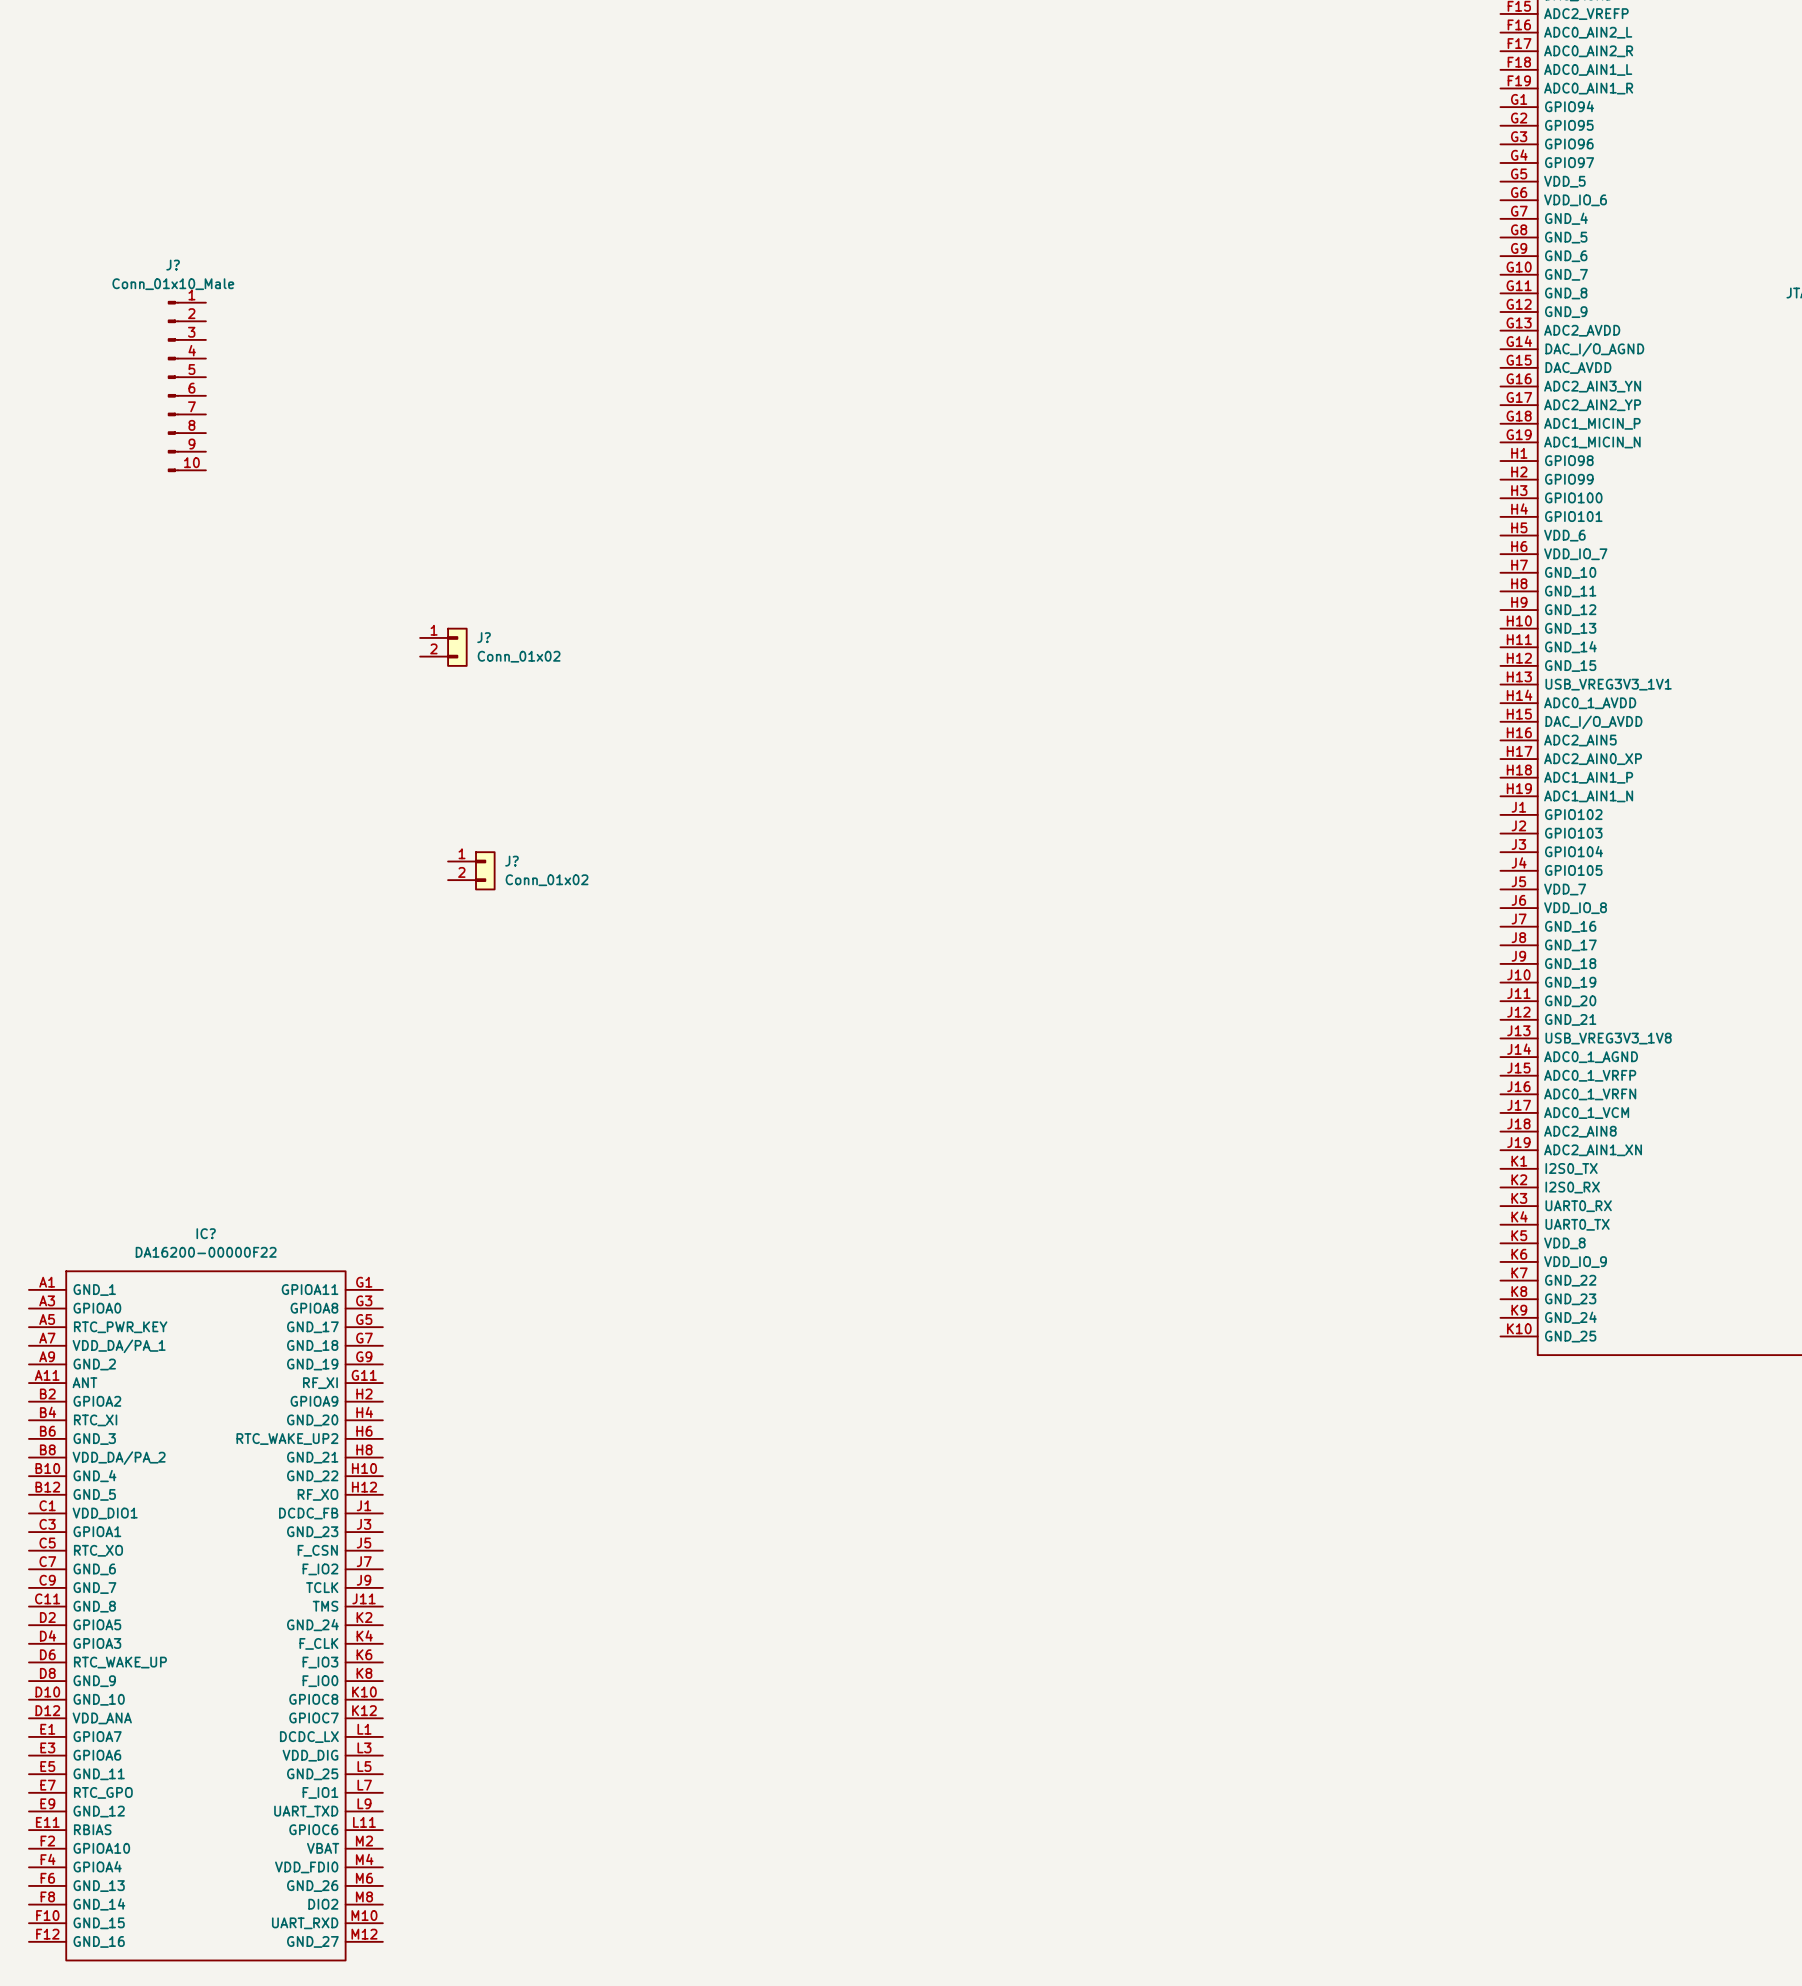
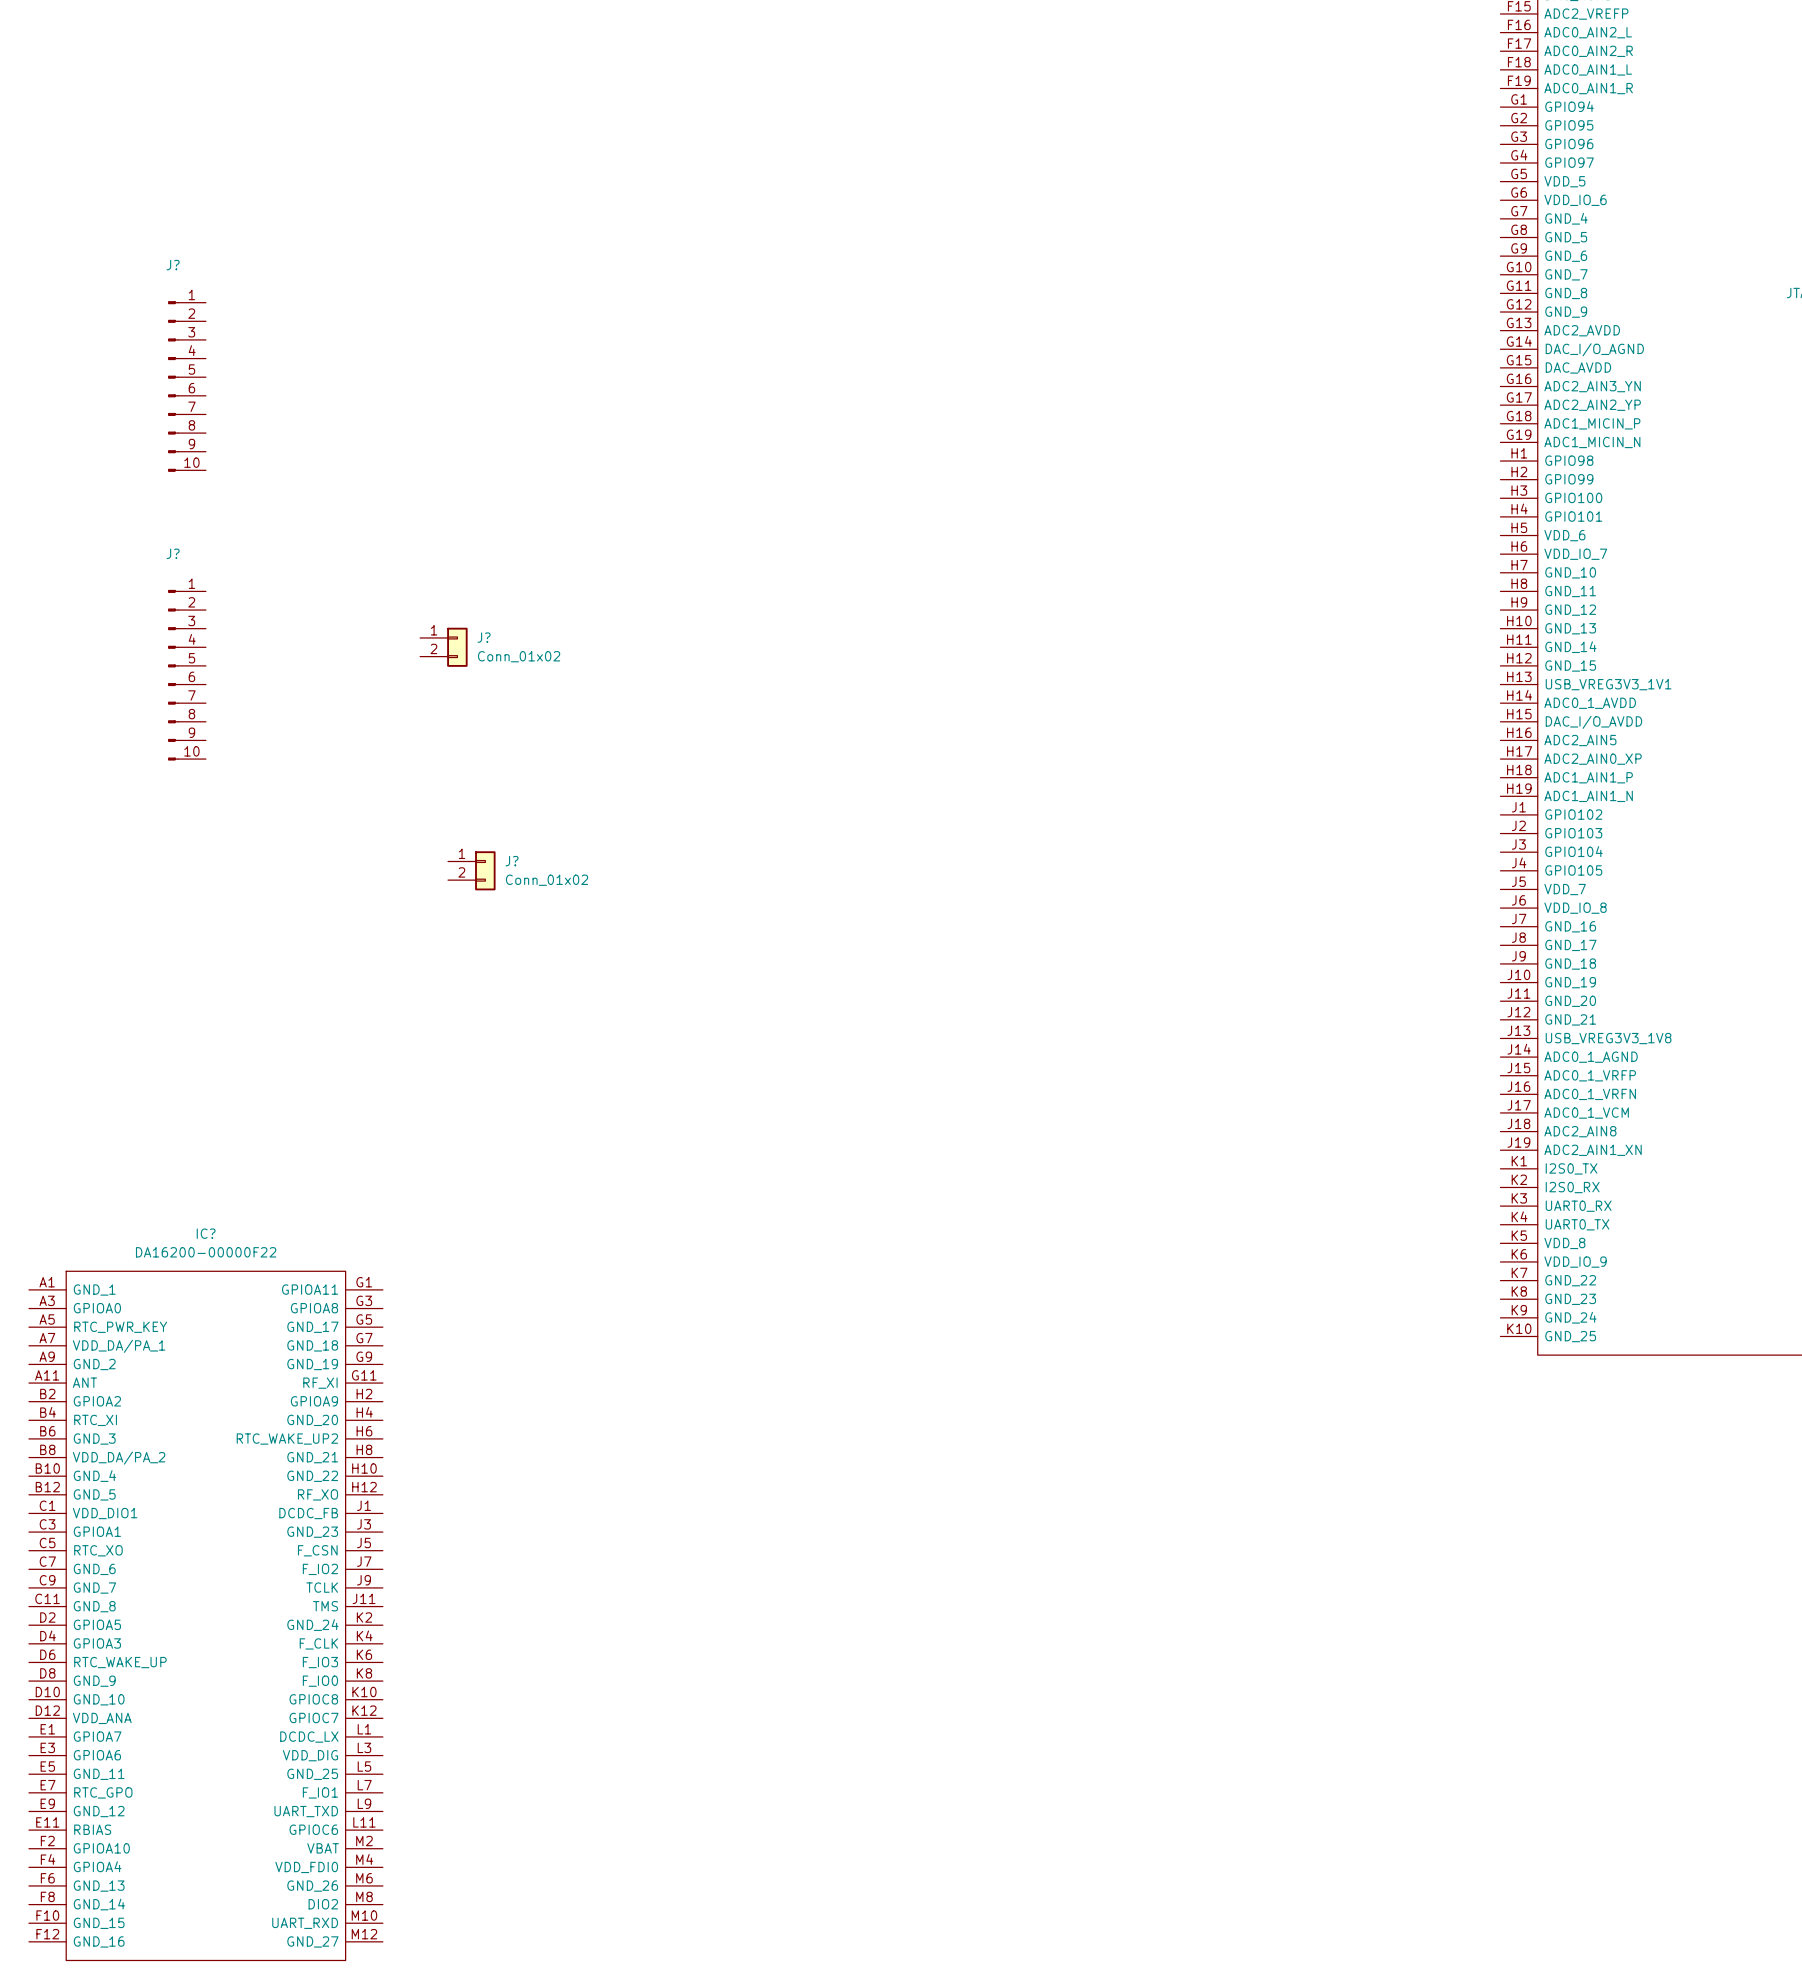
J? value: Conn_01x10_Male (173, 284) -> none
J?: none -> (187, 675)

